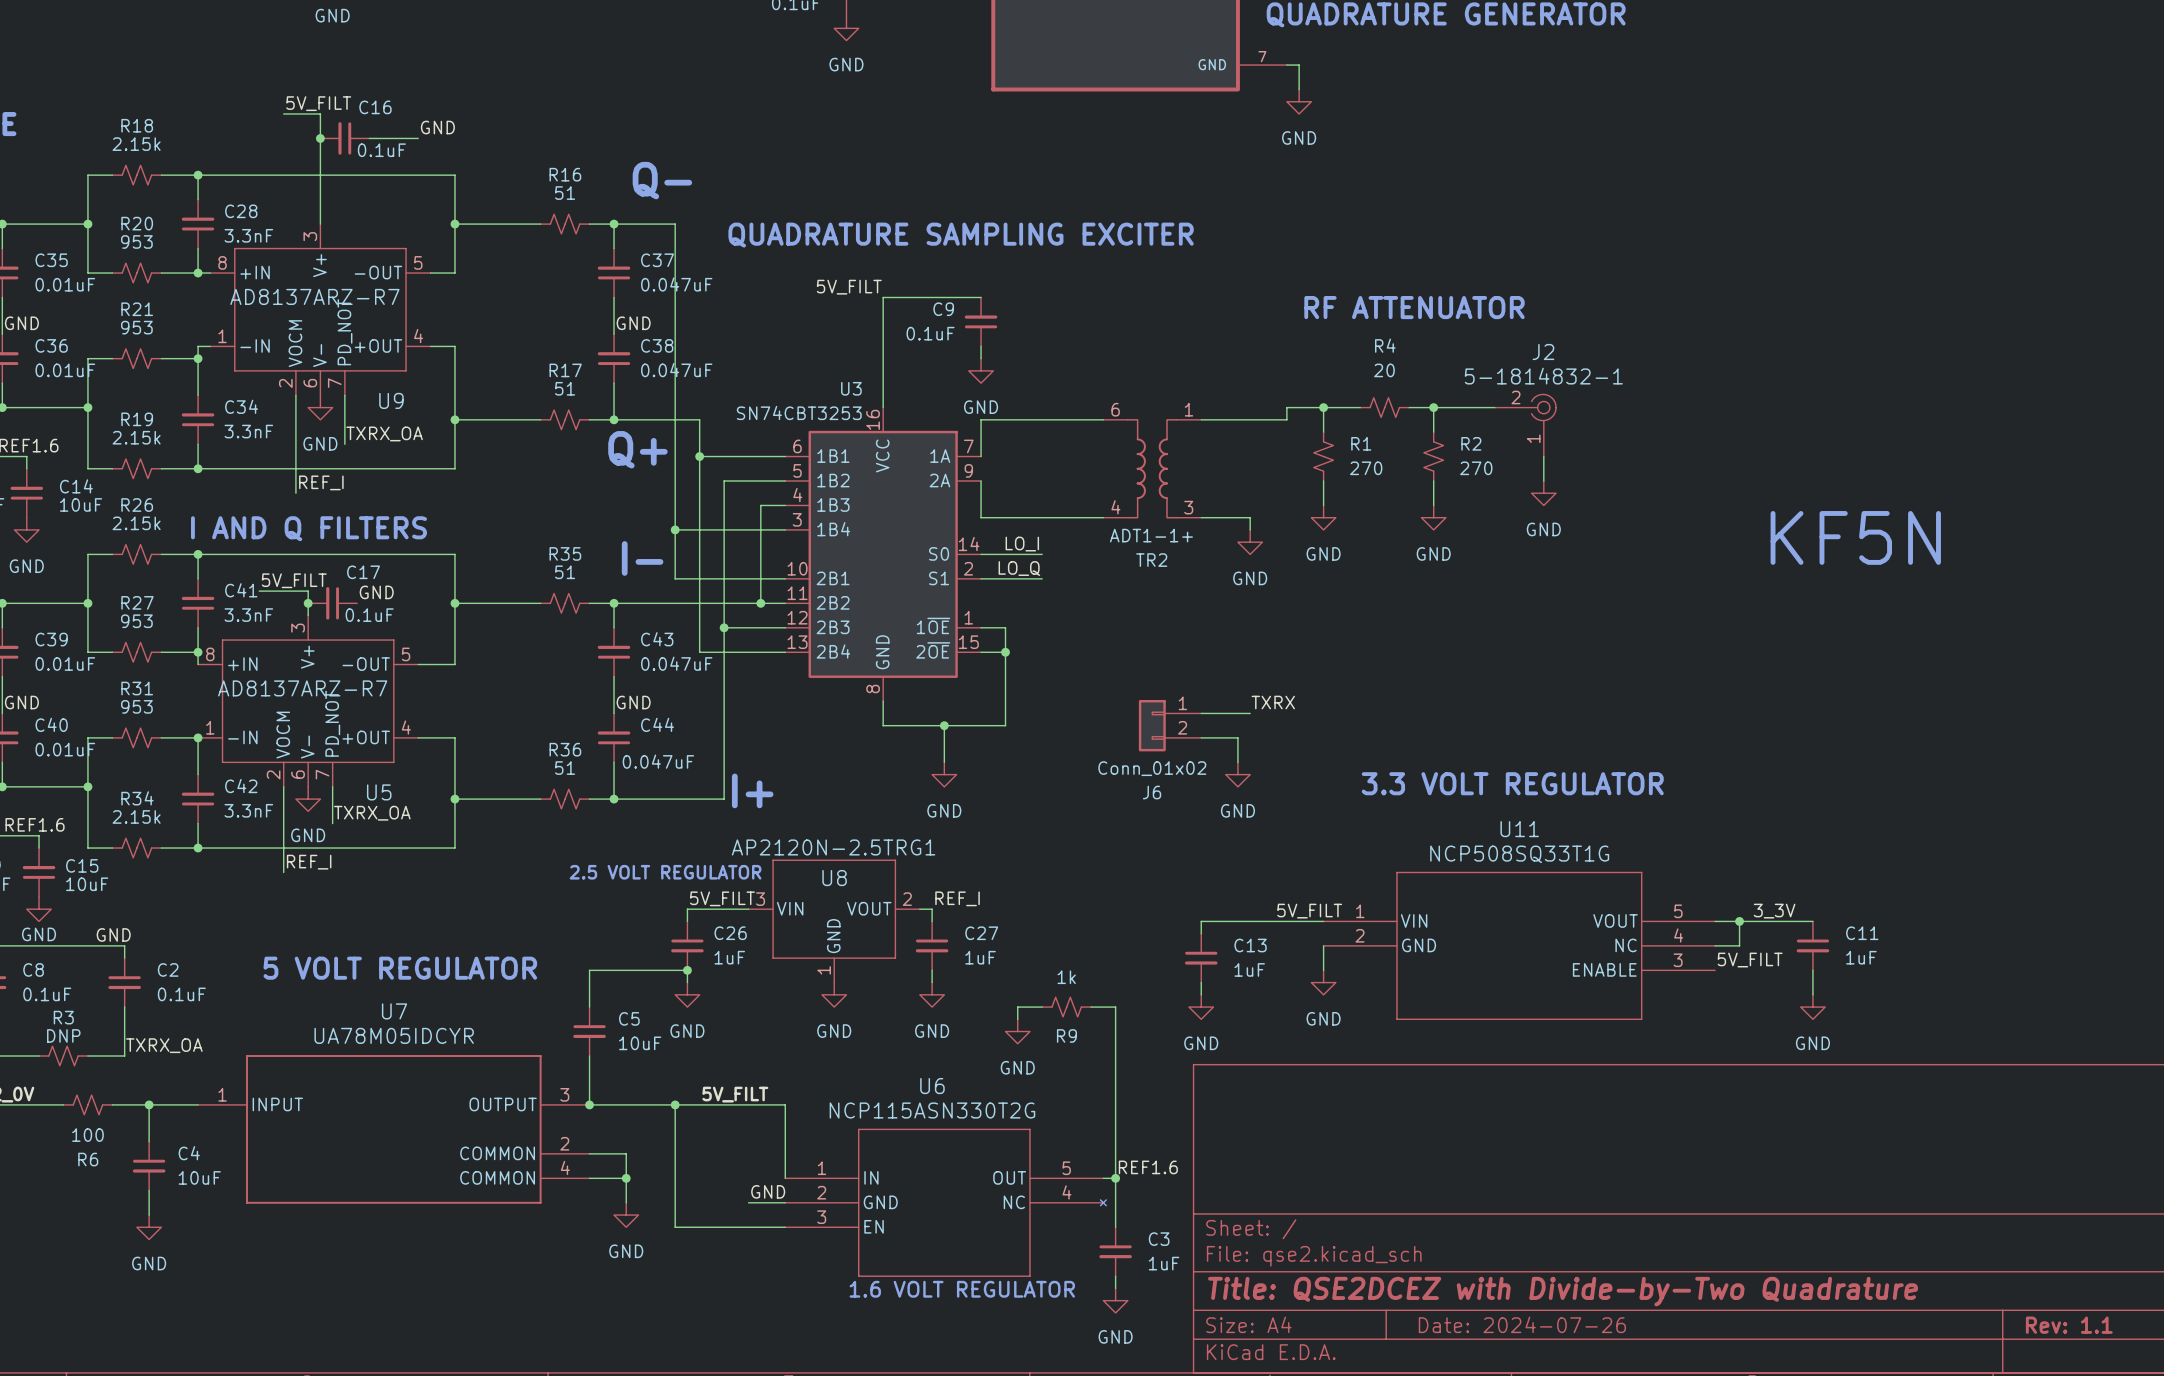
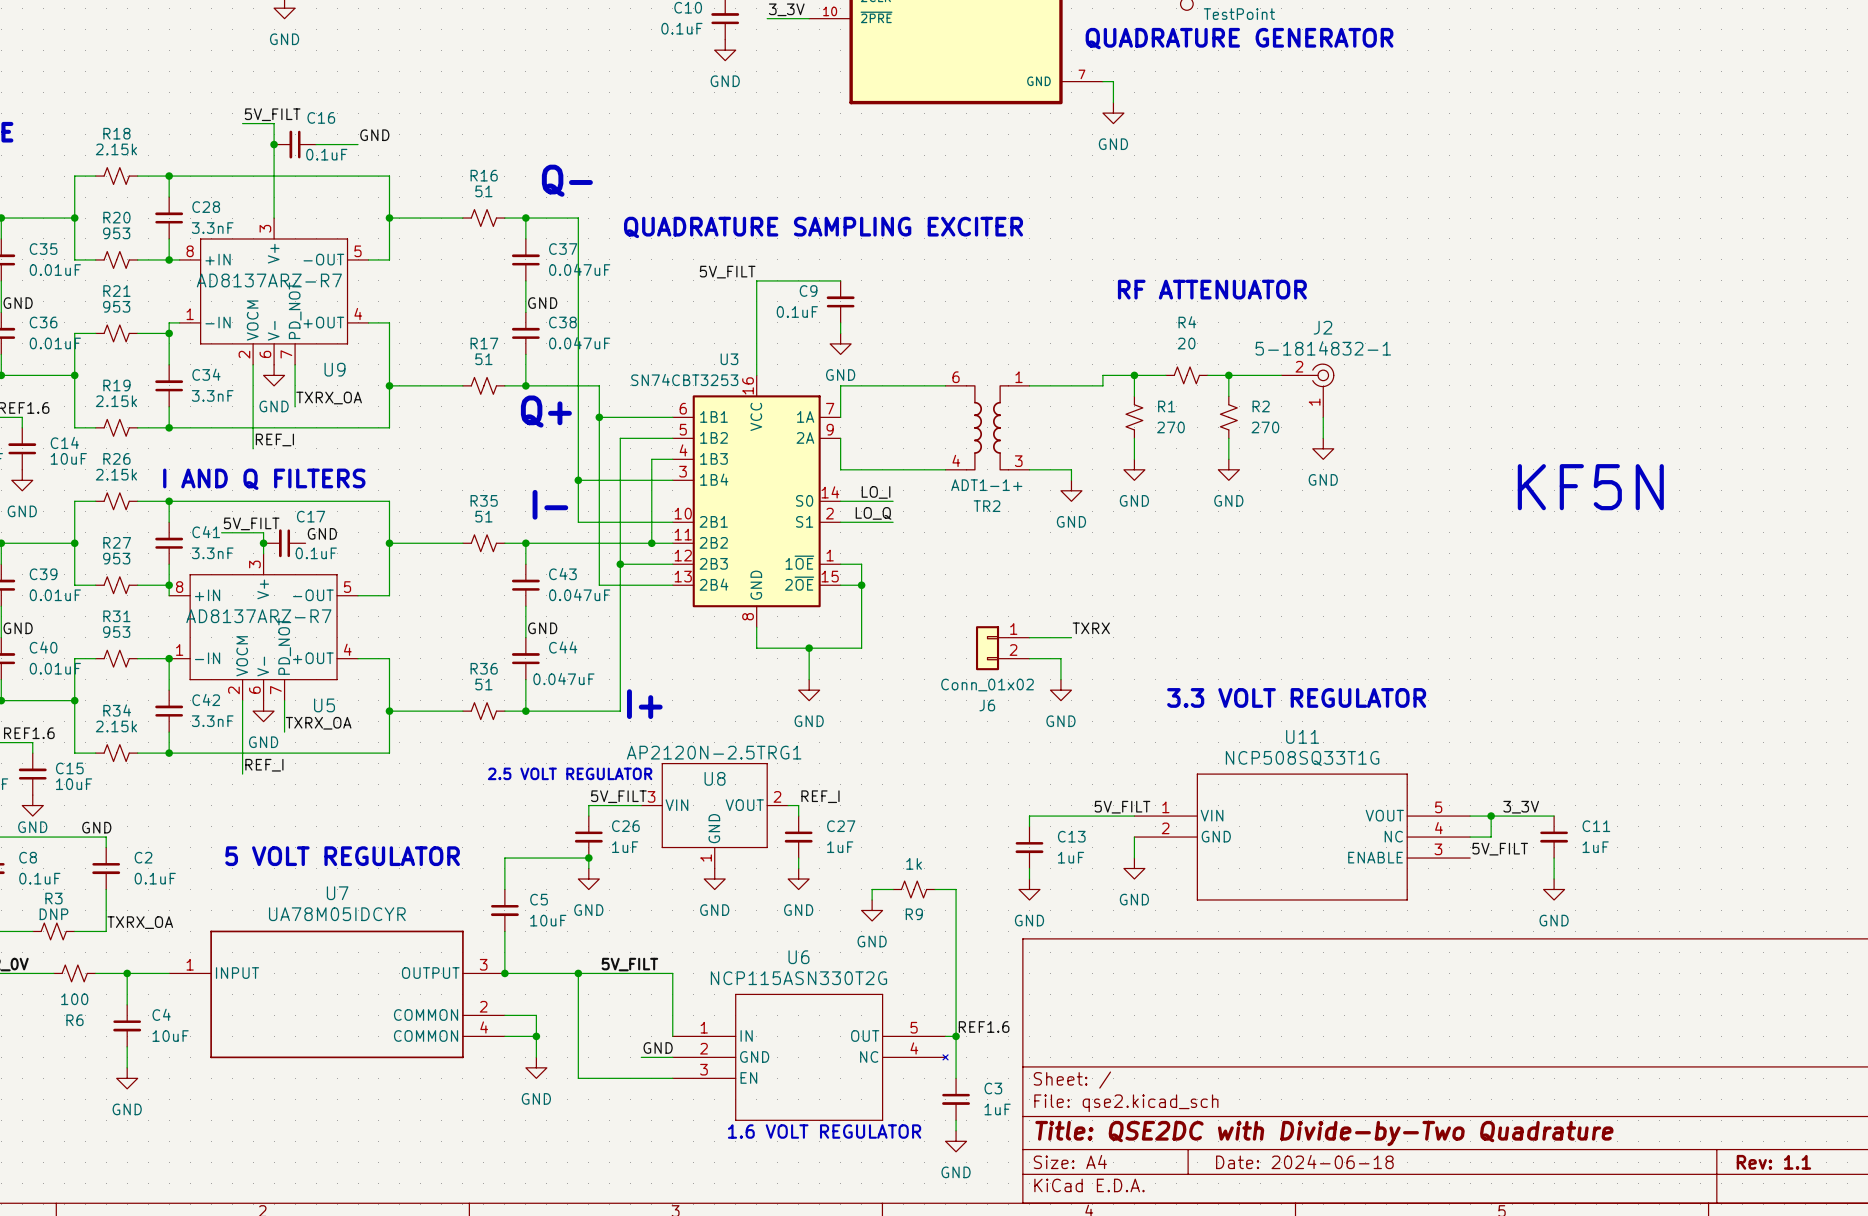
title block: Title: QSE2DCEZ with Divide-by-Two Quadrature (1563, 1291) -> Title: QSE2DC with Divide-by-Two Quadrature (1324, 1133)
title block: Date: 2024-07-26 (1522, 1324) -> Date: 2024-06-18 (1304, 1162)

